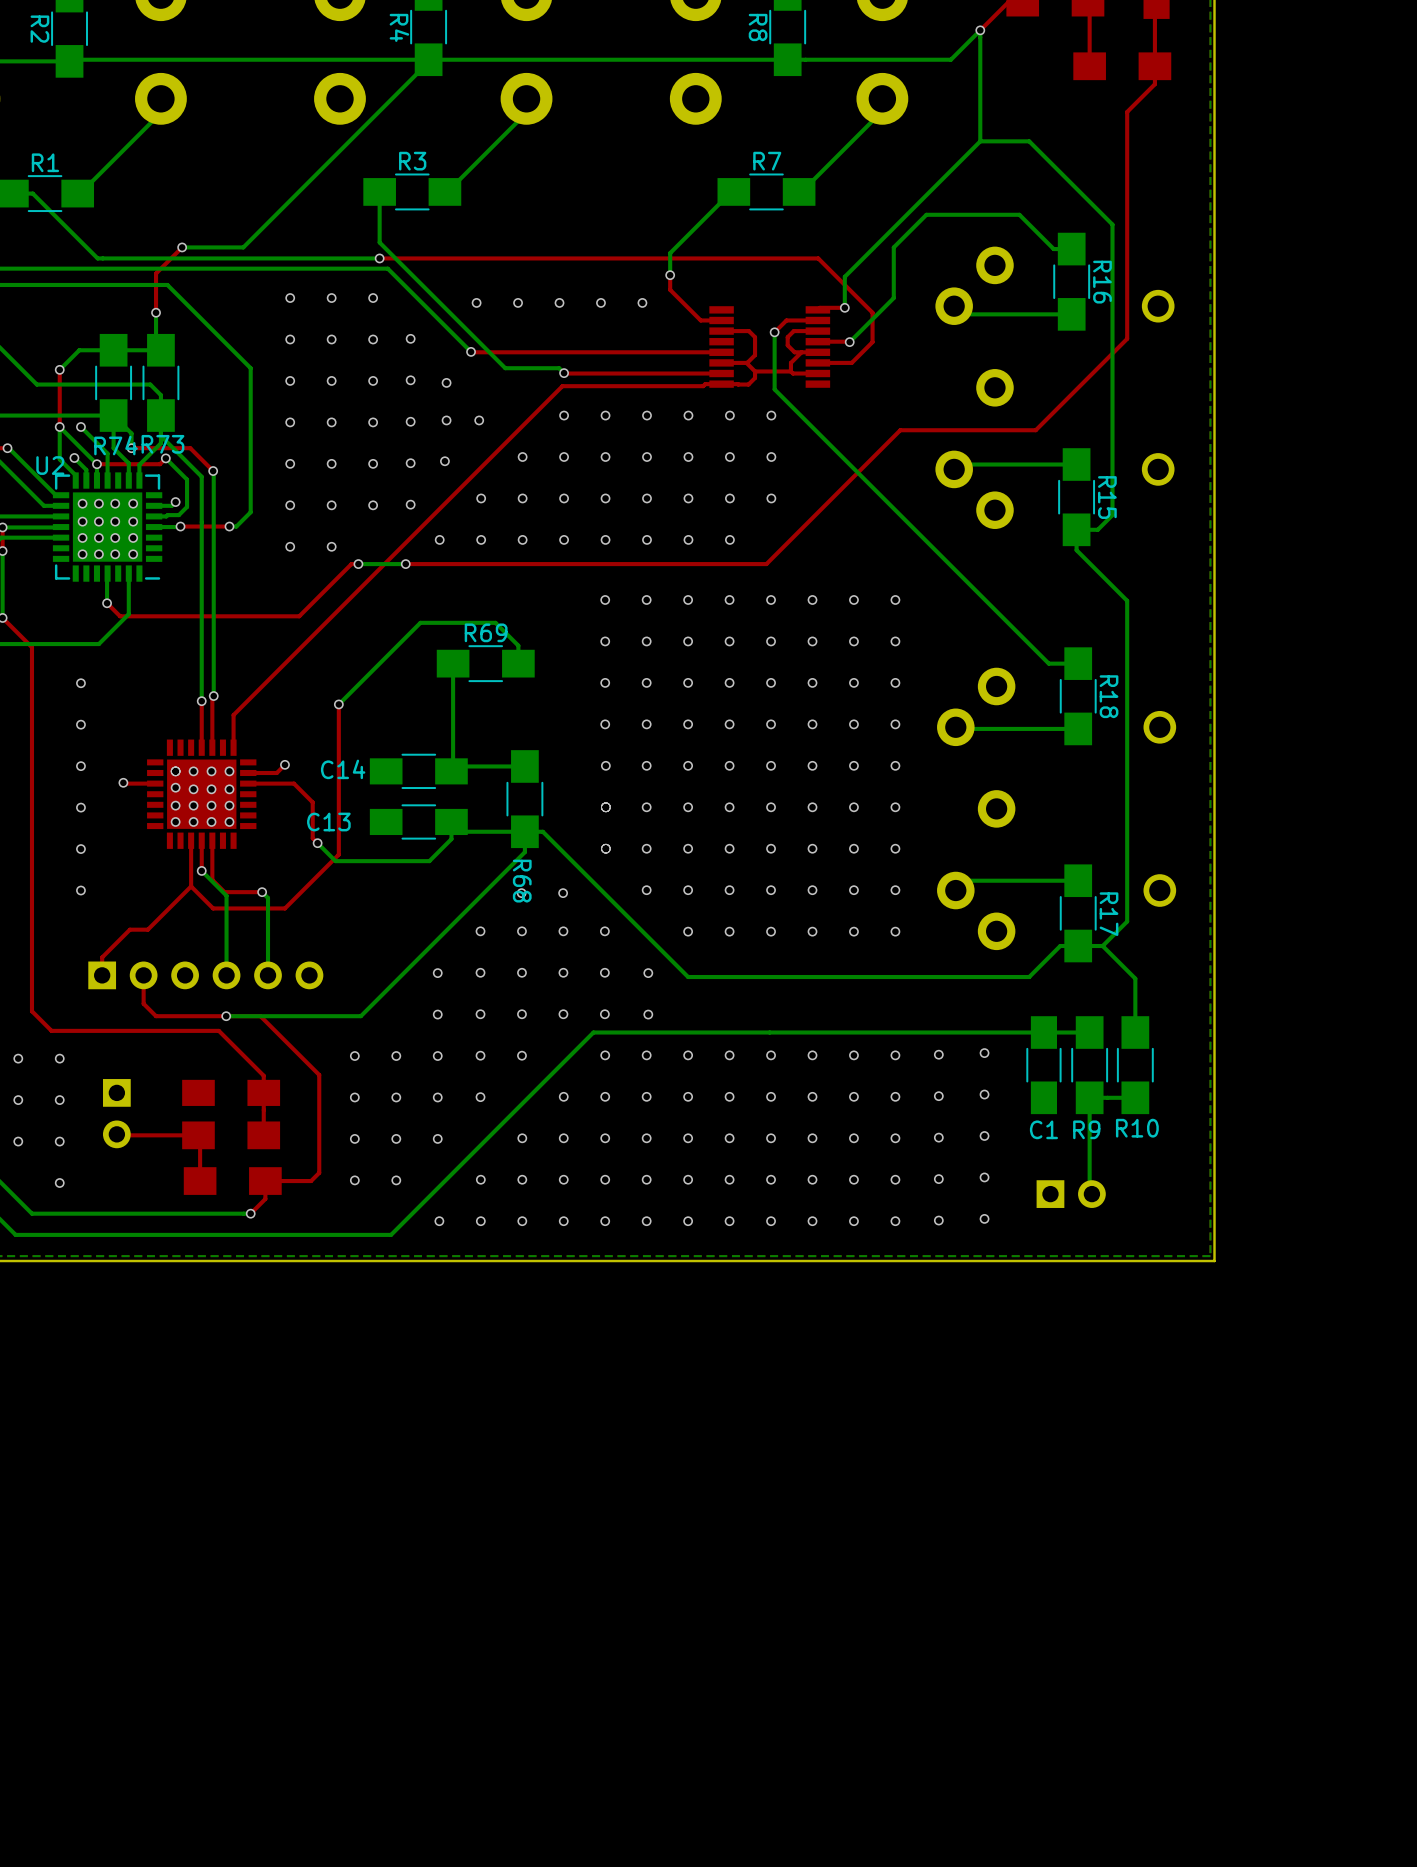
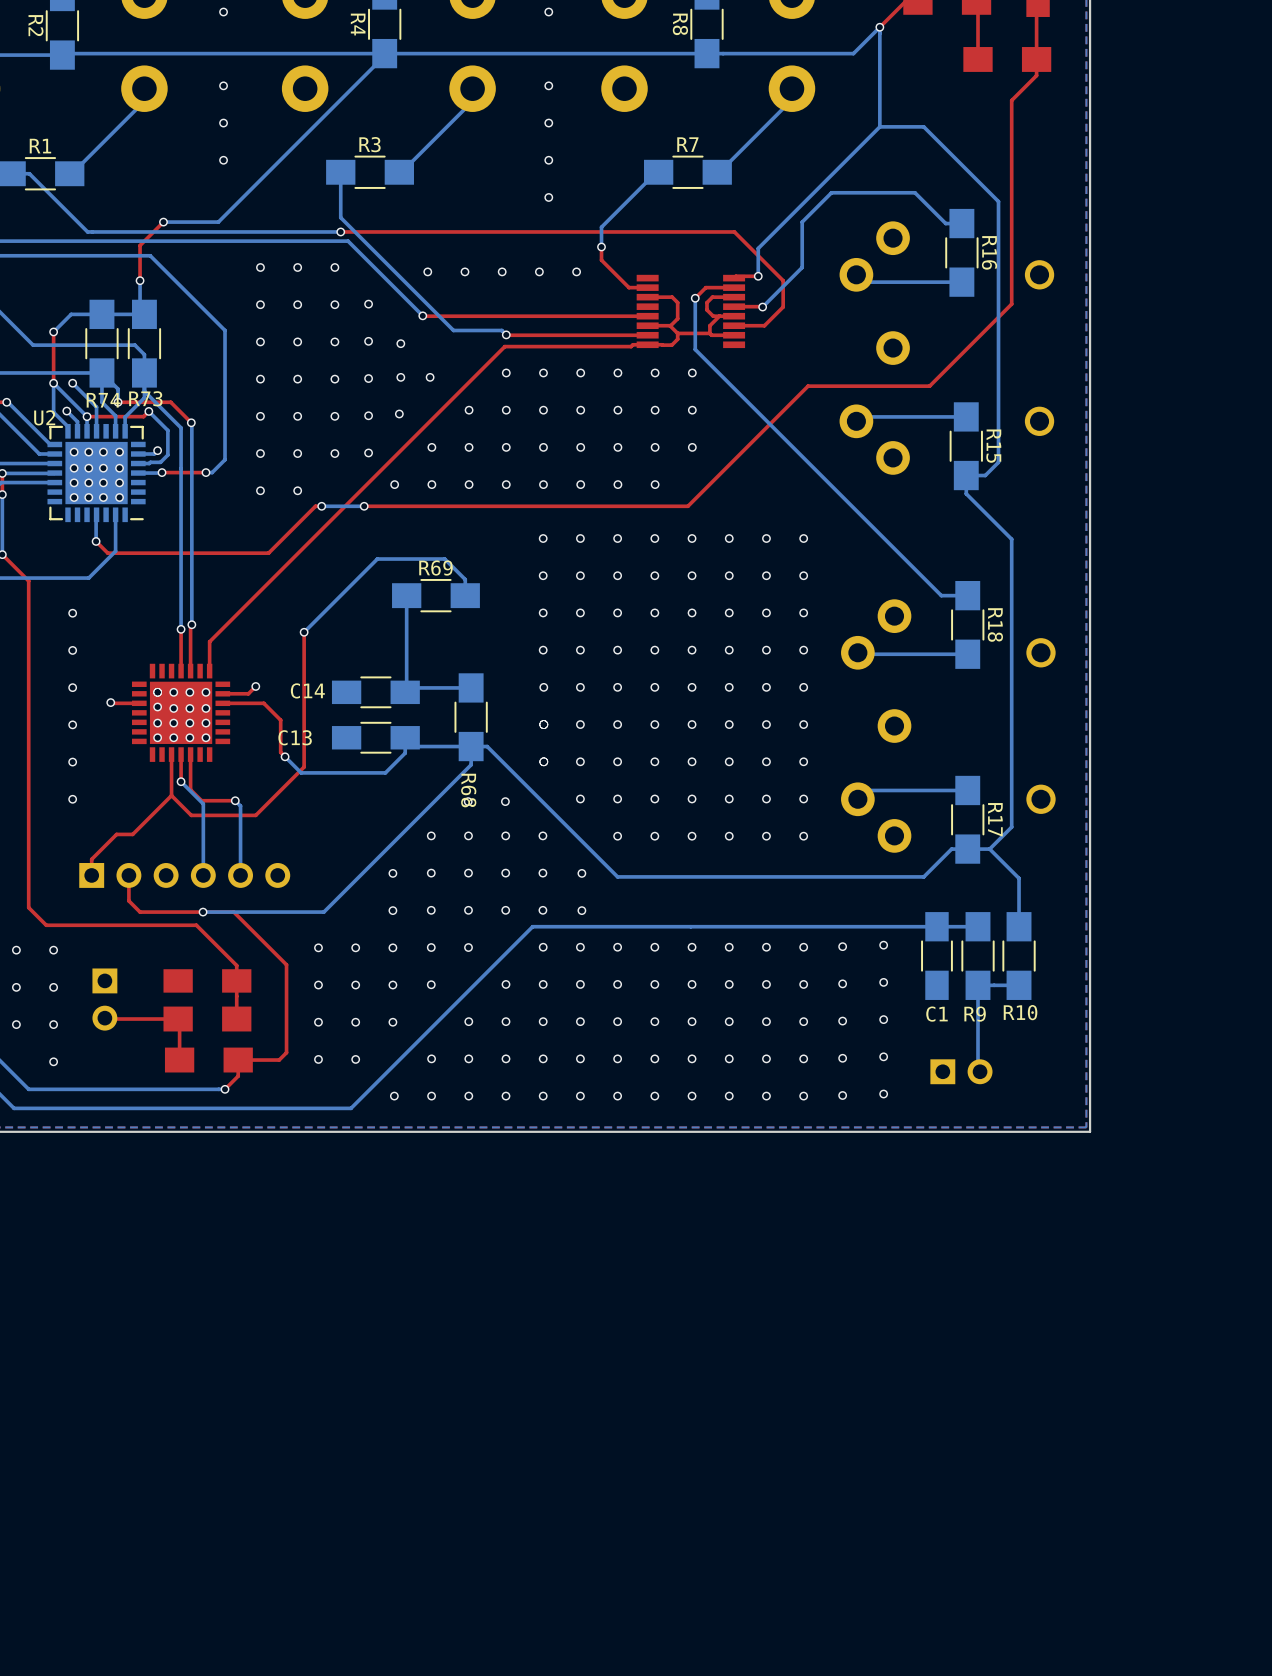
via: none -> (223, 12)
via: none -> (548, 12)
via: none -> (223, 85)
via: none -> (548, 85)
via: none -> (223, 123)
via: none -> (548, 123)
via: none -> (223, 160)
via: none -> (548, 160)
via: none -> (548, 197)

